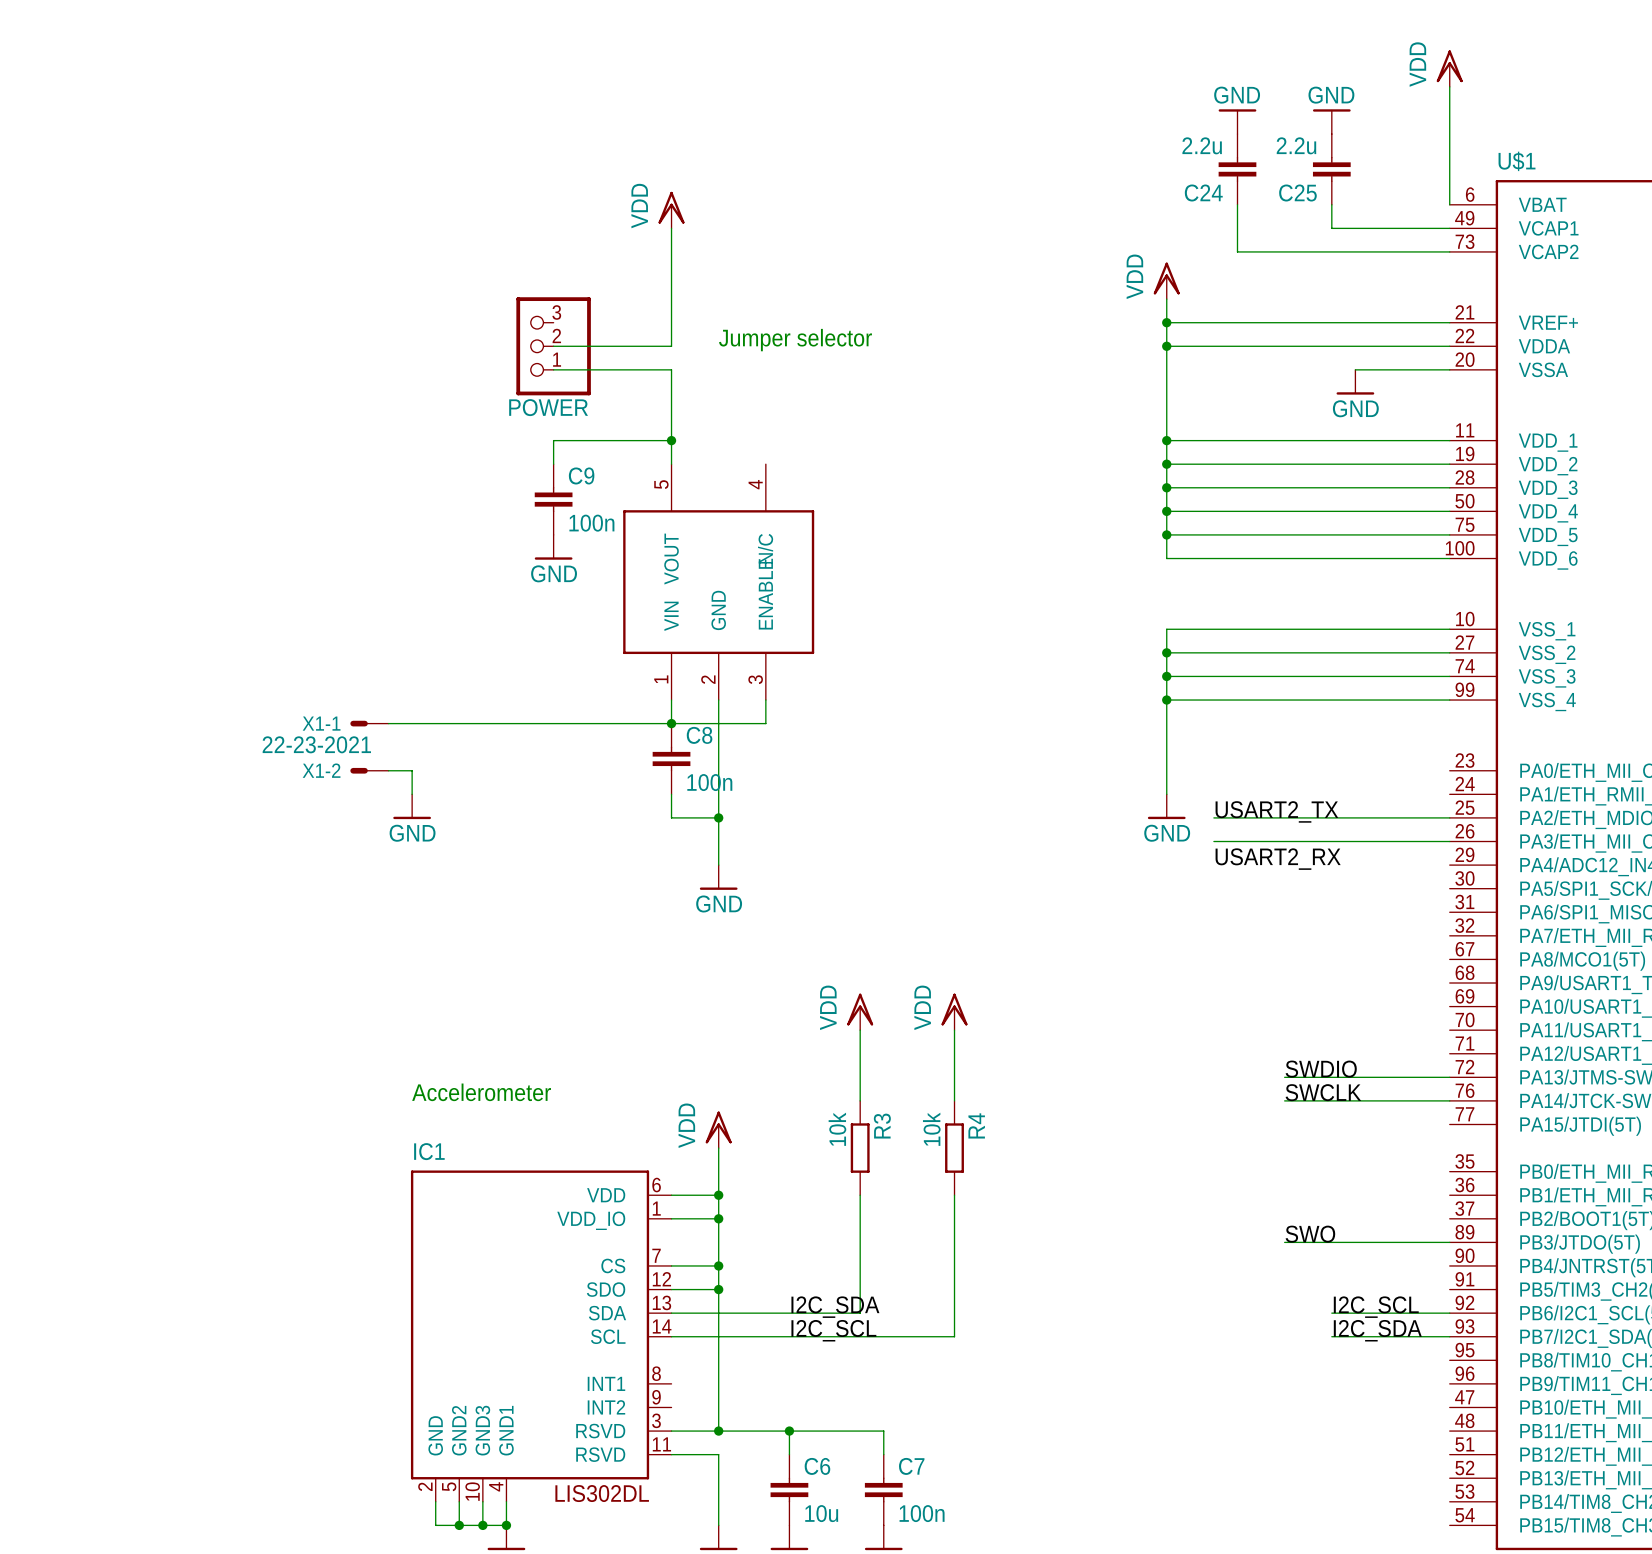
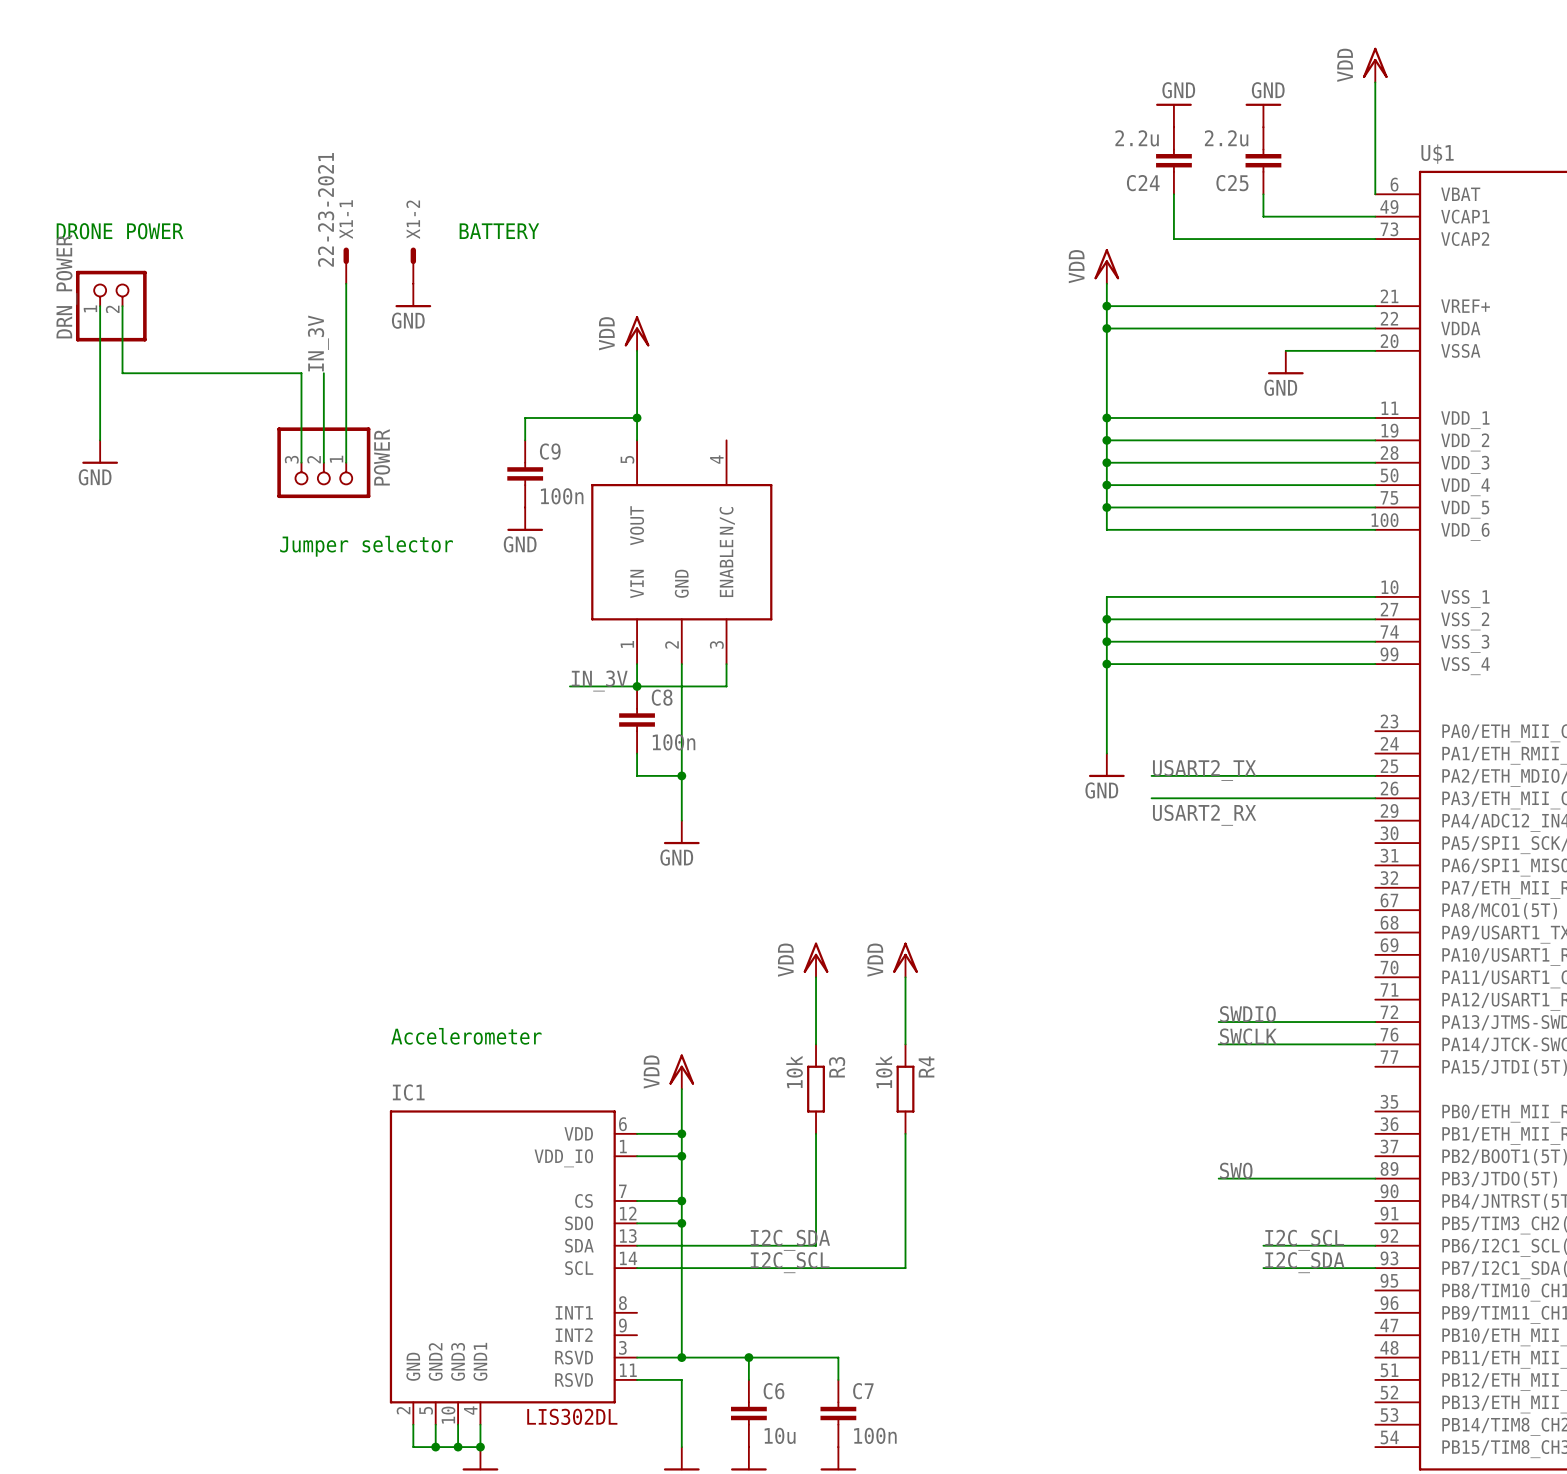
power symbol position: VDD (671, 210) -> VDD (637, 333)
wire: (671, 228) (671, 346) (553, 346) -> none
text: none -> DRONE POWER (120, 231)
text: none -> BATTERY (499, 231)
wire: none -> (346, 283) (346, 462)
power symbol: none -> GND (413, 295)
wire: none -> (100, 306) (100, 440)
DRN_POWER: none -> (111, 306)
wire: none -> (122, 306) (122, 373) (301, 373) (301, 462)
text: Jumper selector (795, 340) -> none
POWER: (553, 346) -> none
label: none -> IN_3V (318, 343)
wire: (553, 369) (671, 369) -> none
wire: none -> (323, 373) (323, 462)
power symbol: none -> GND (100, 452)
POWER: none -> (323, 462)
text: none -> Jumper selector (366, 546)
label: none -> IN_3V (599, 681)
X1-1 rotation: 0° (359, 723) -> 90° clockwise (346, 255)
X1-1 position: (369, 723) -> (346, 265)
wire: (388, 723) (600, 723) -> none
X1-2 rotation: 0° (359, 770) -> 90° clockwise (413, 255)
X1-2 position: (369, 770) -> (413, 265)
wire: (388, 770) (412, 770) (412, 794) -> none
power symbol: GND (412, 806) -> none

